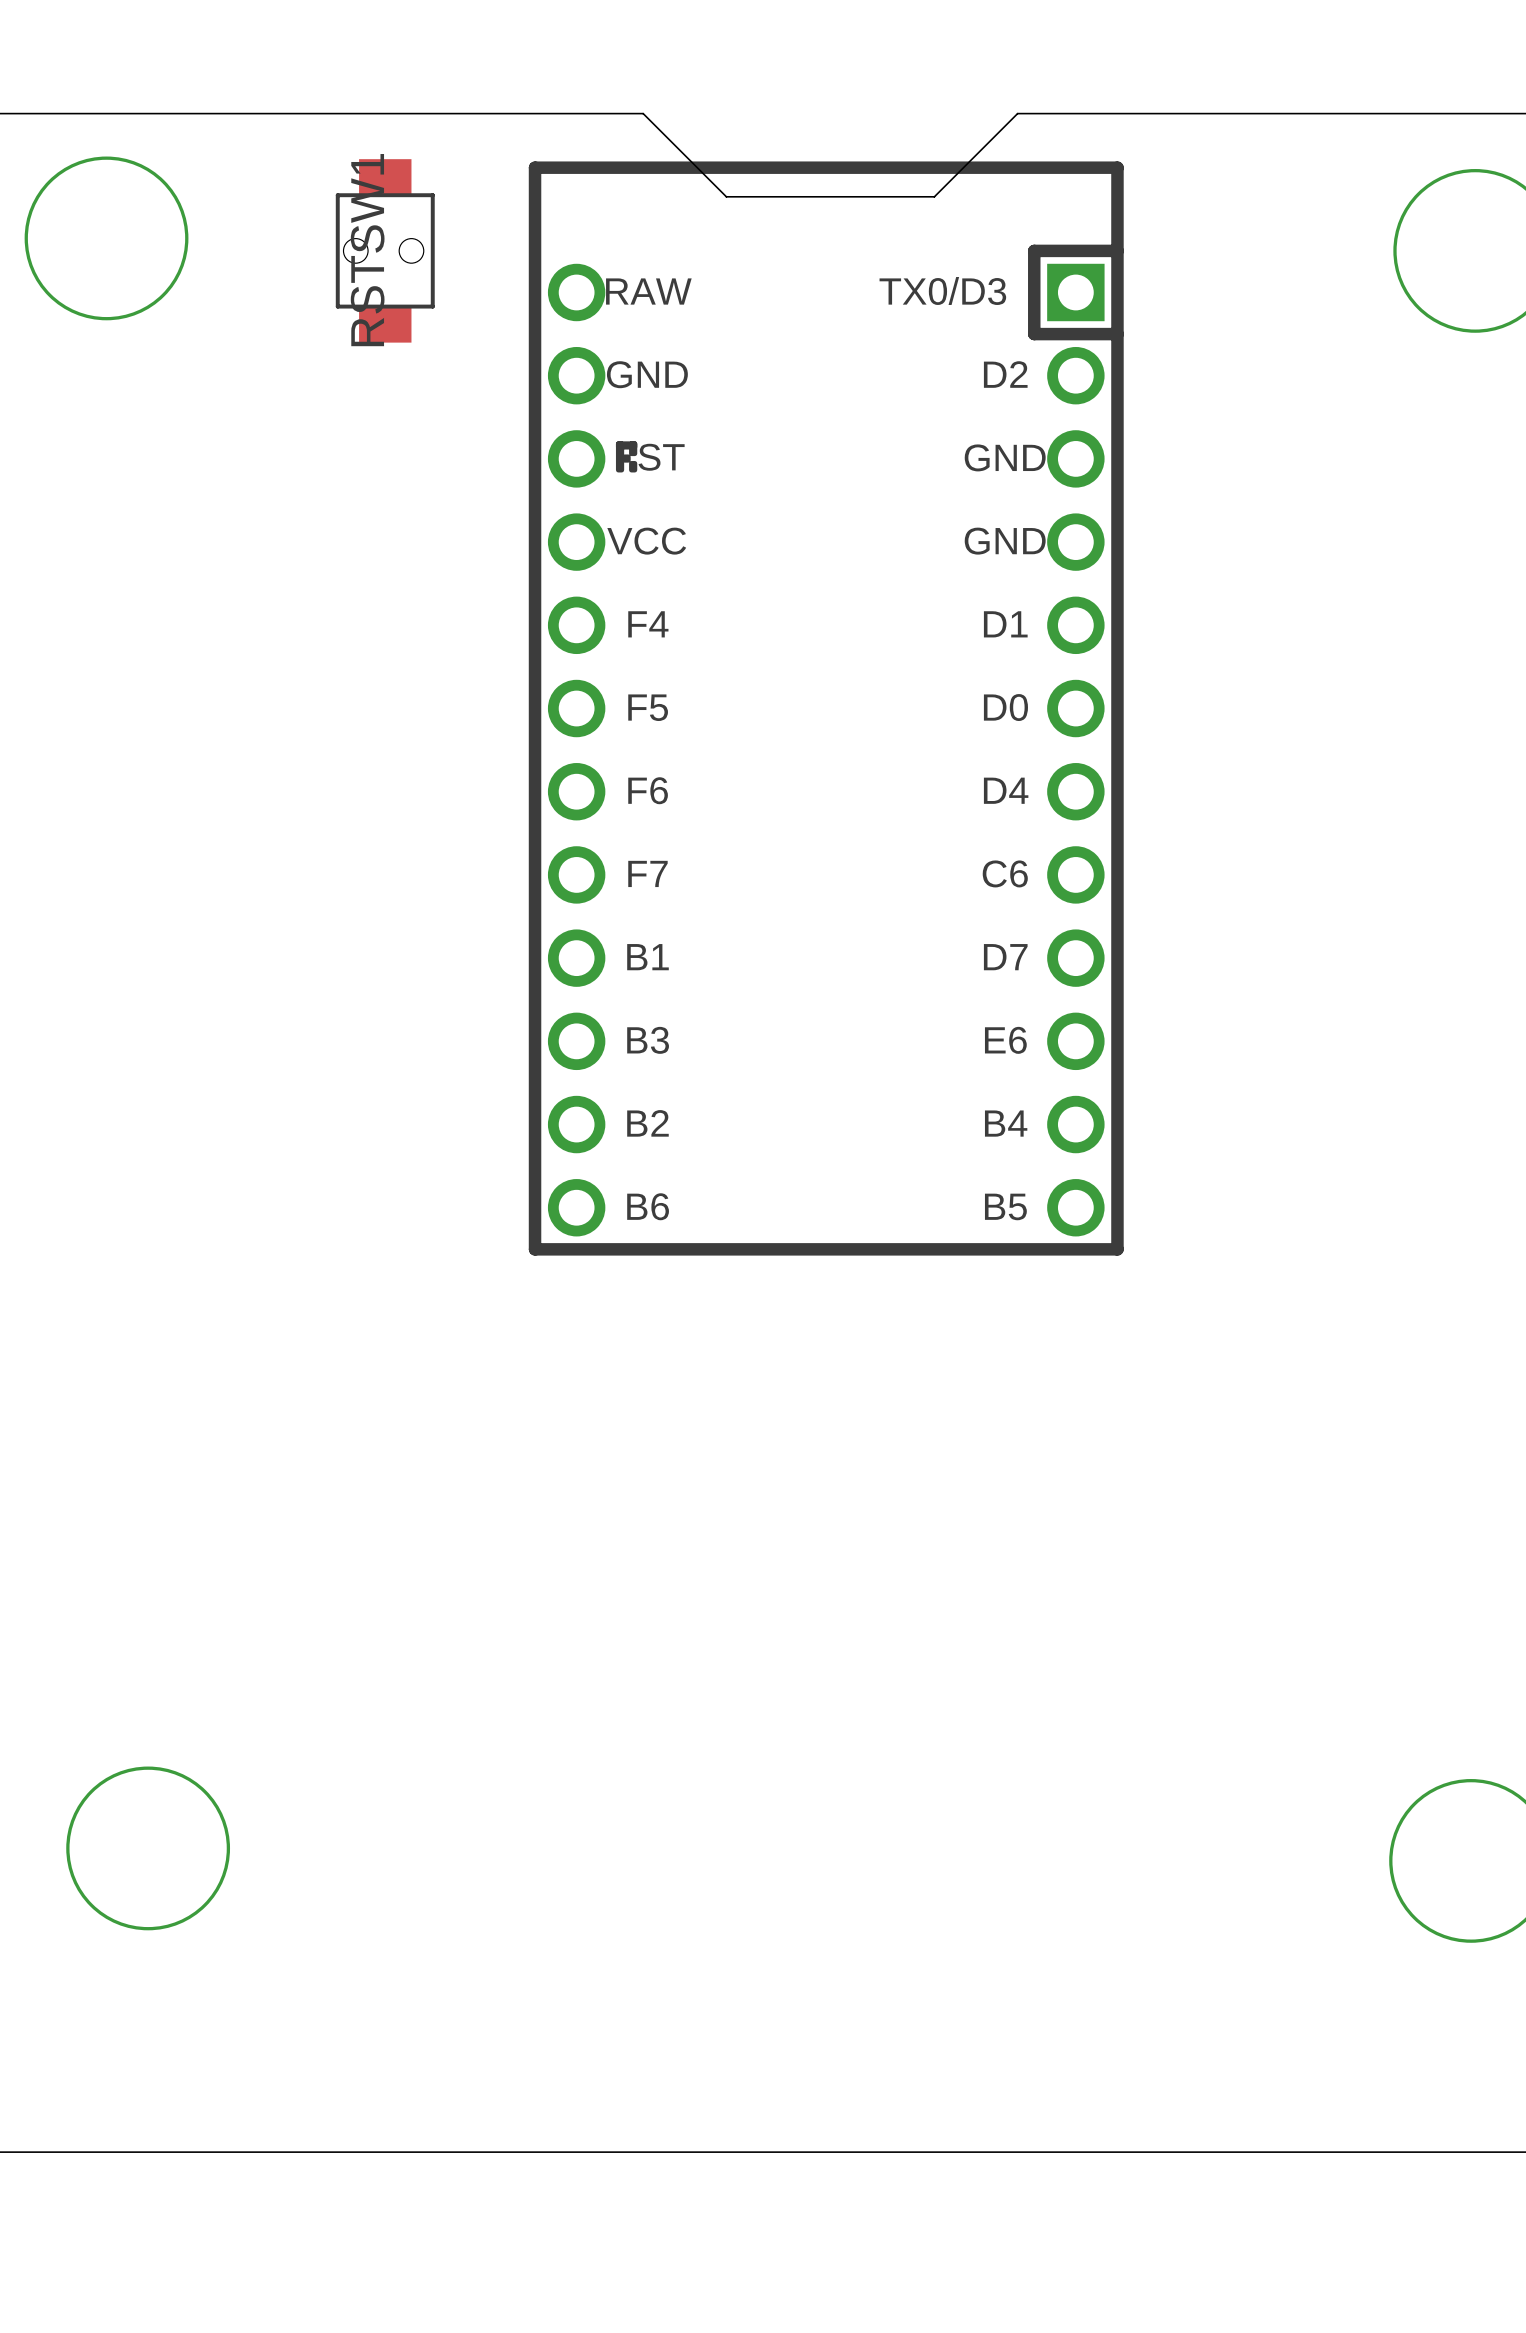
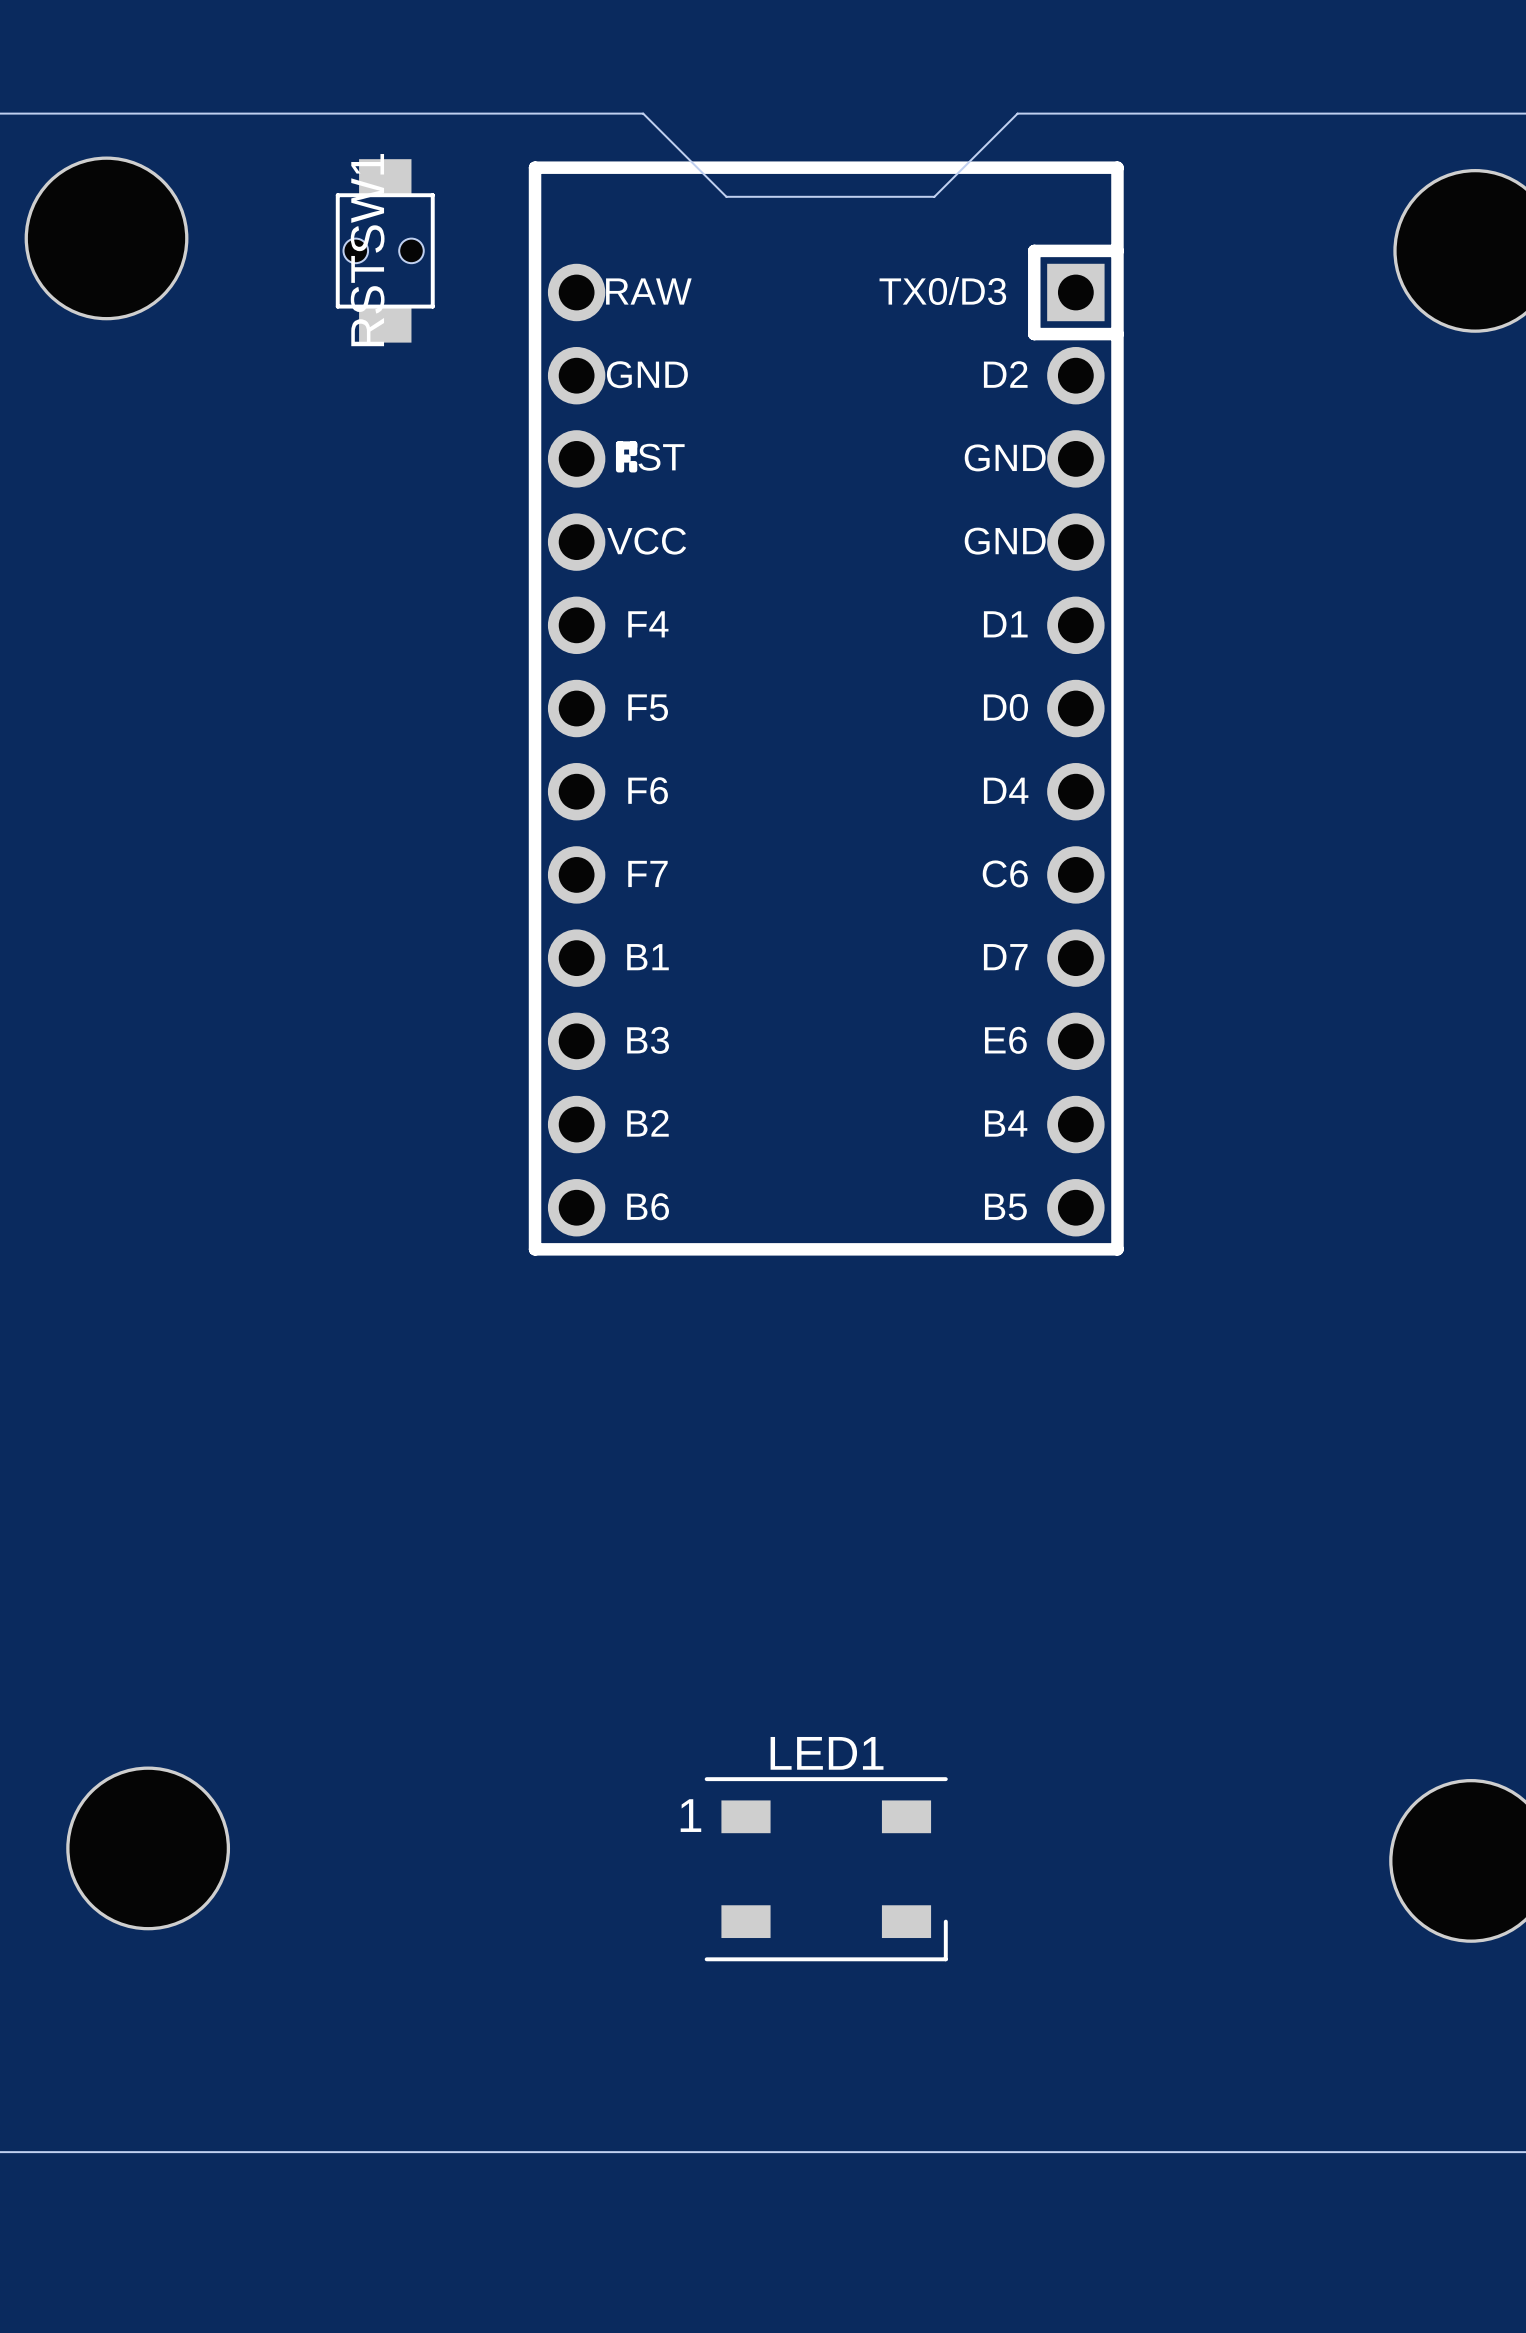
LED1: none -> (826, 1869)

